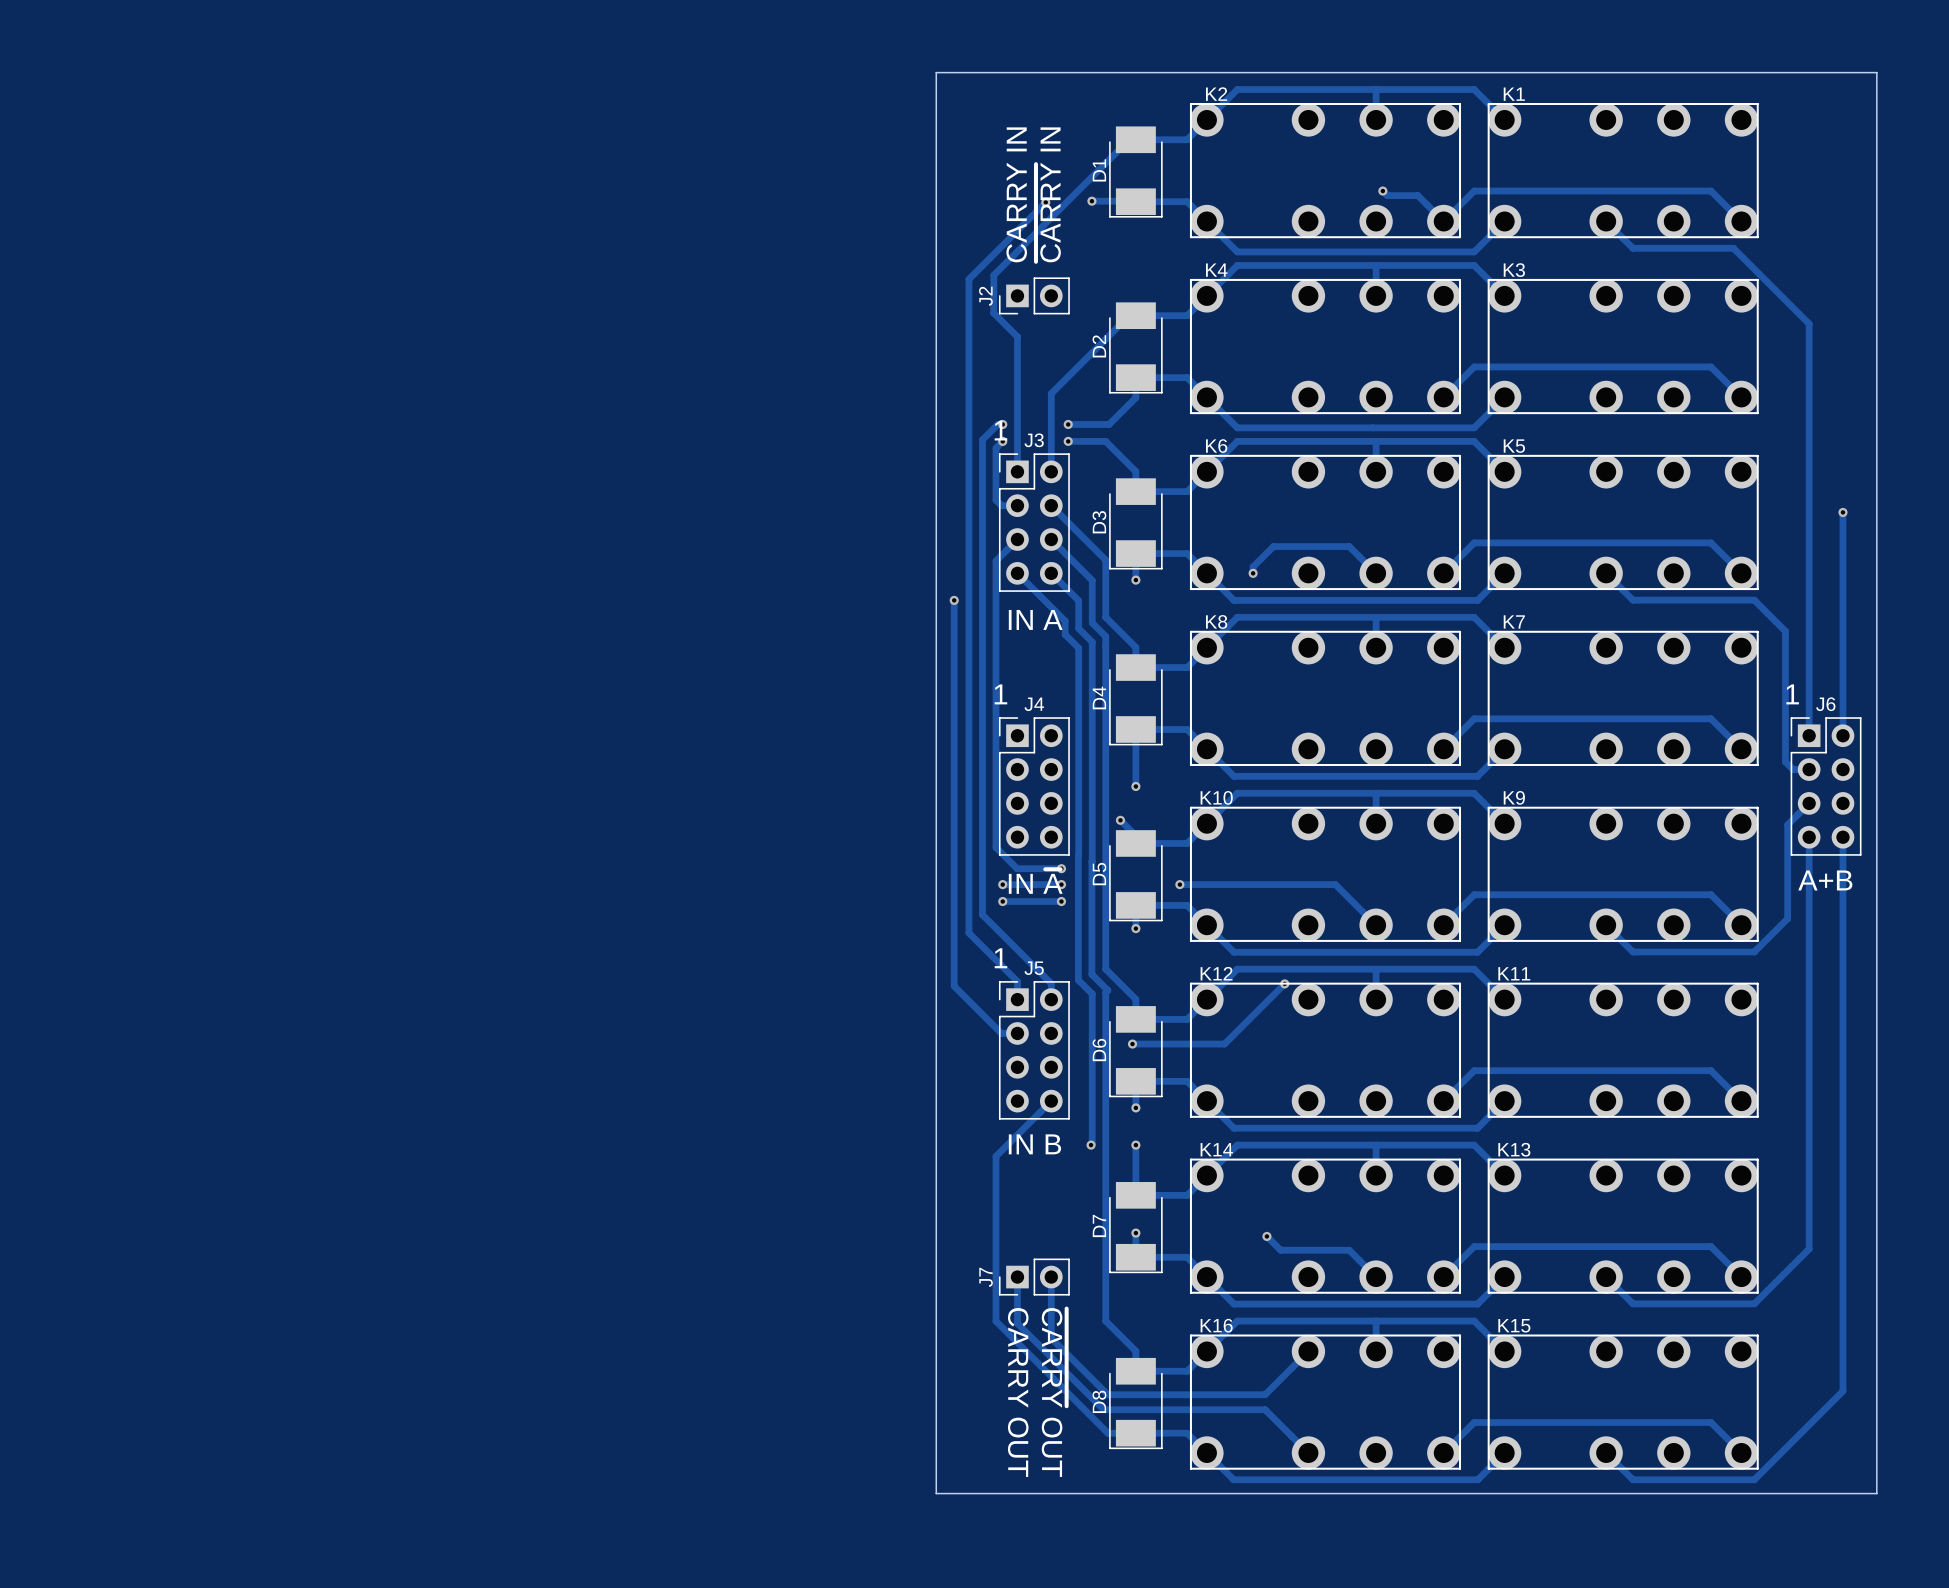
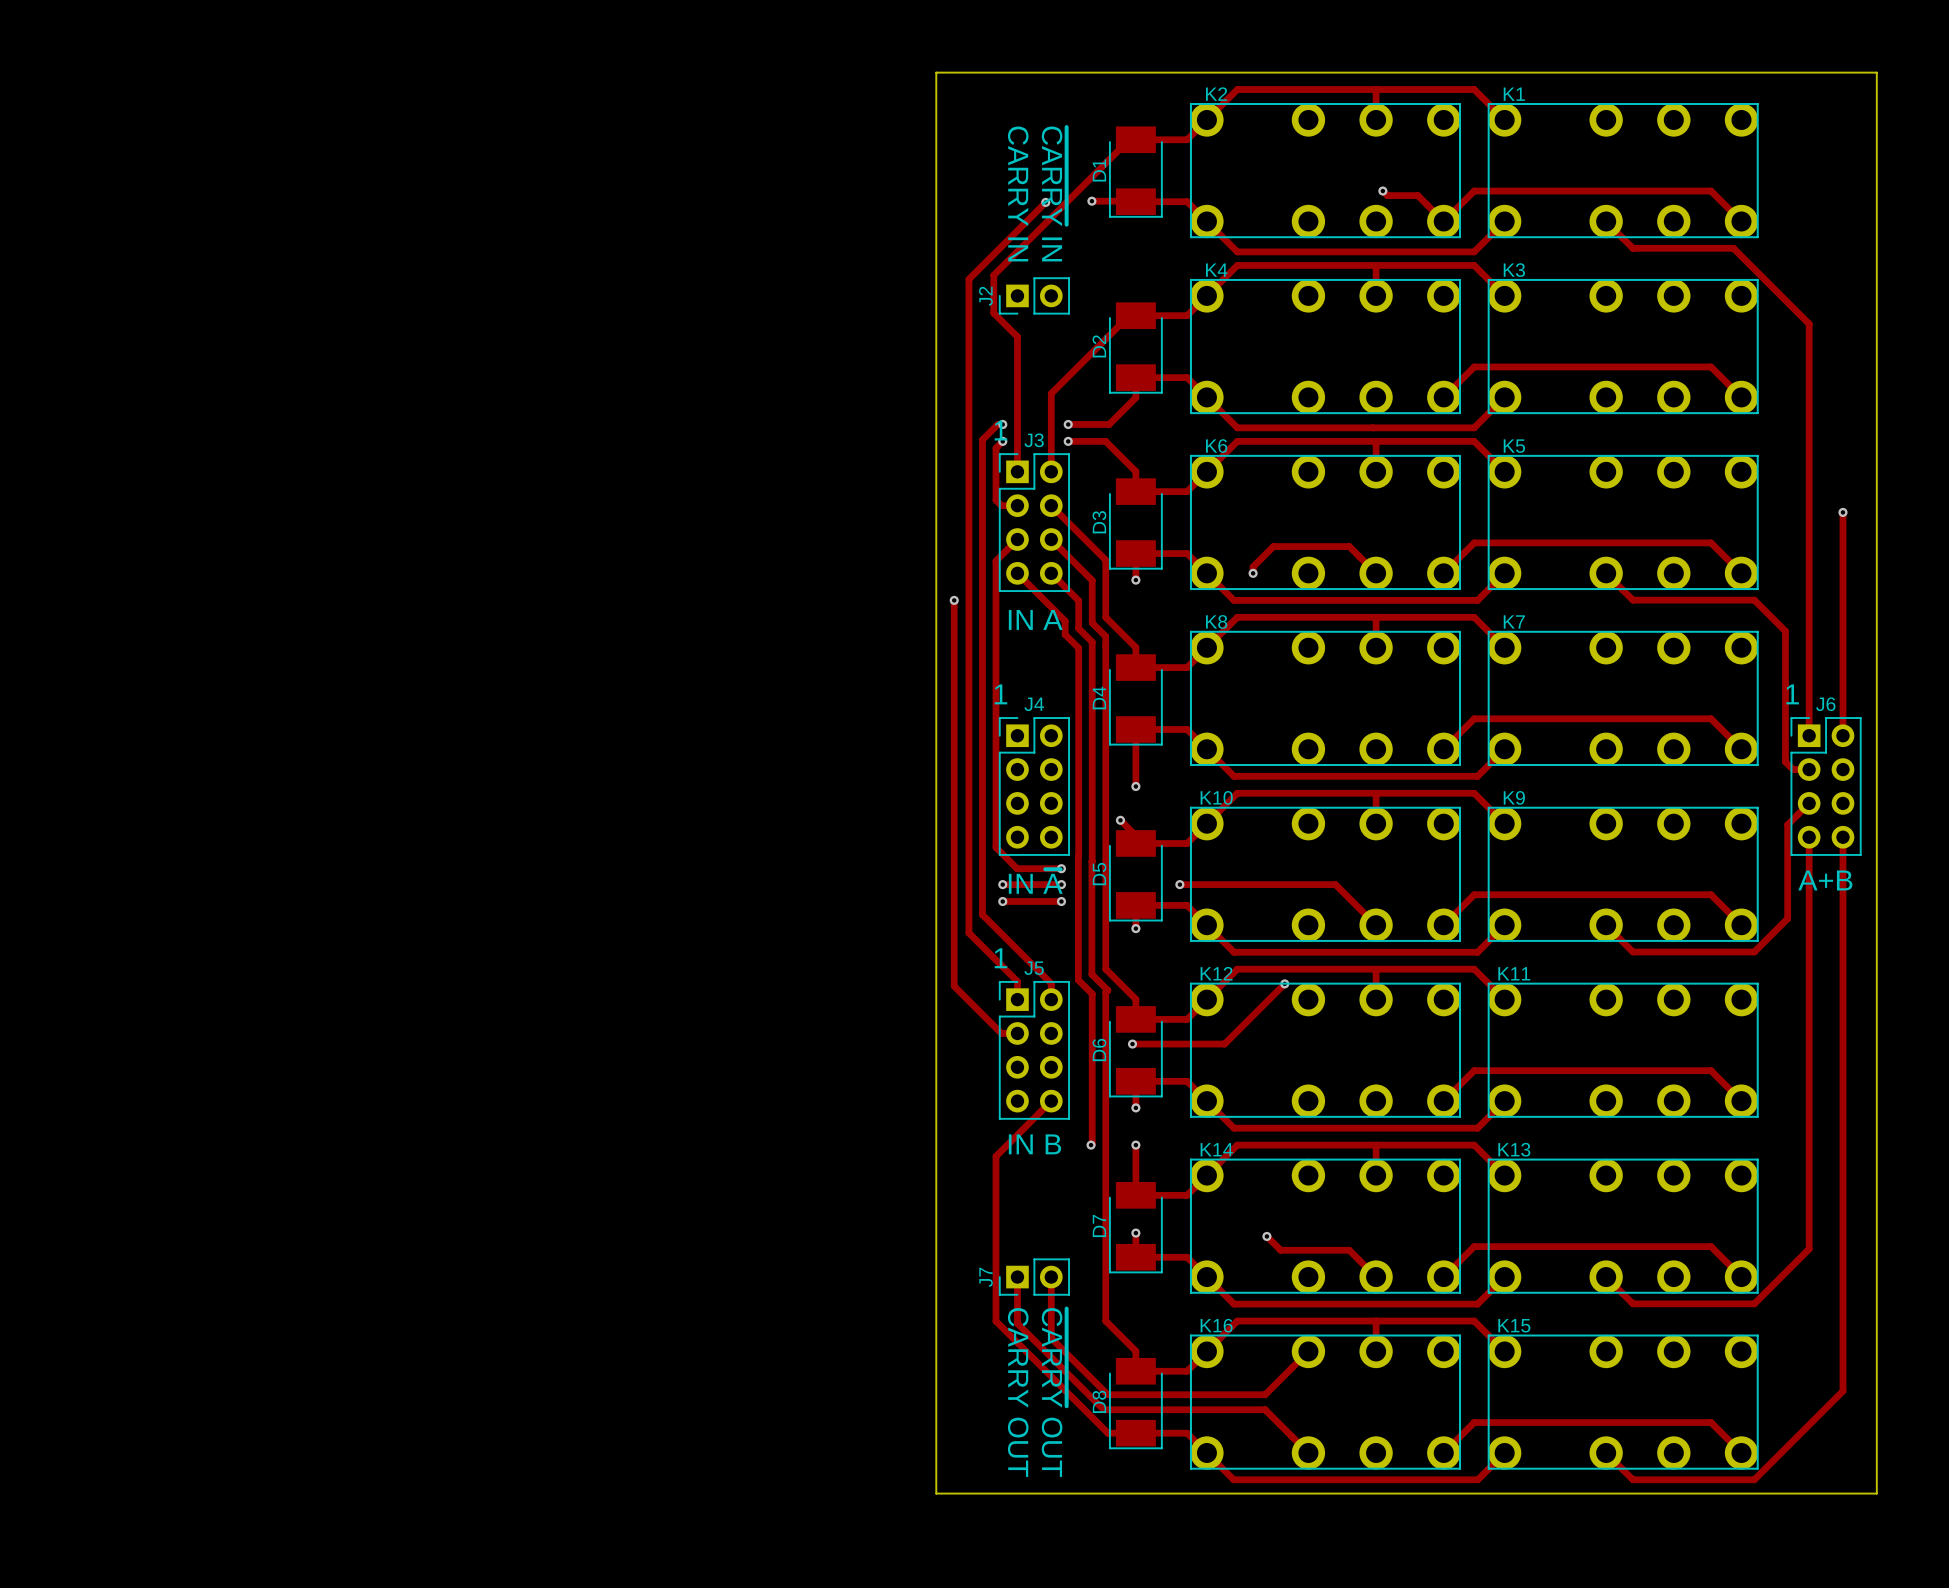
text rotation: 0° (1016, 194) -> 180° (1018, 193)
text rotation: 0° (1048, 194) -> 180° (1054, 193)

